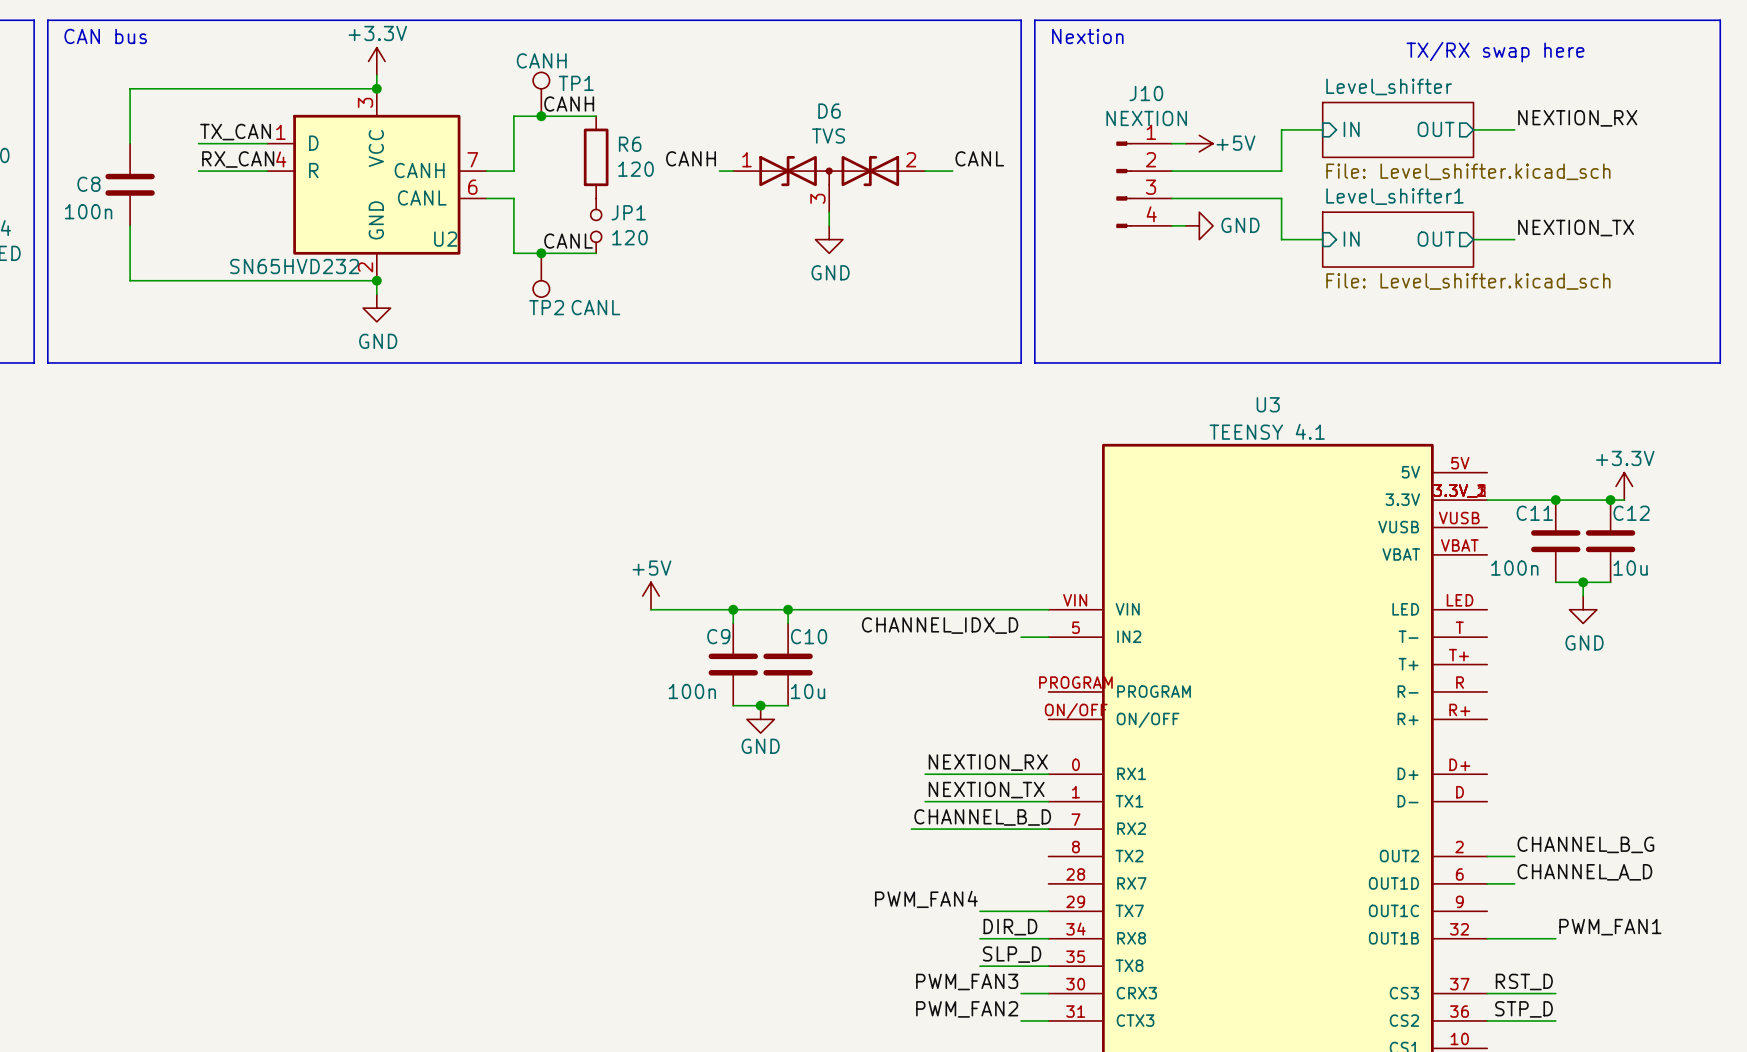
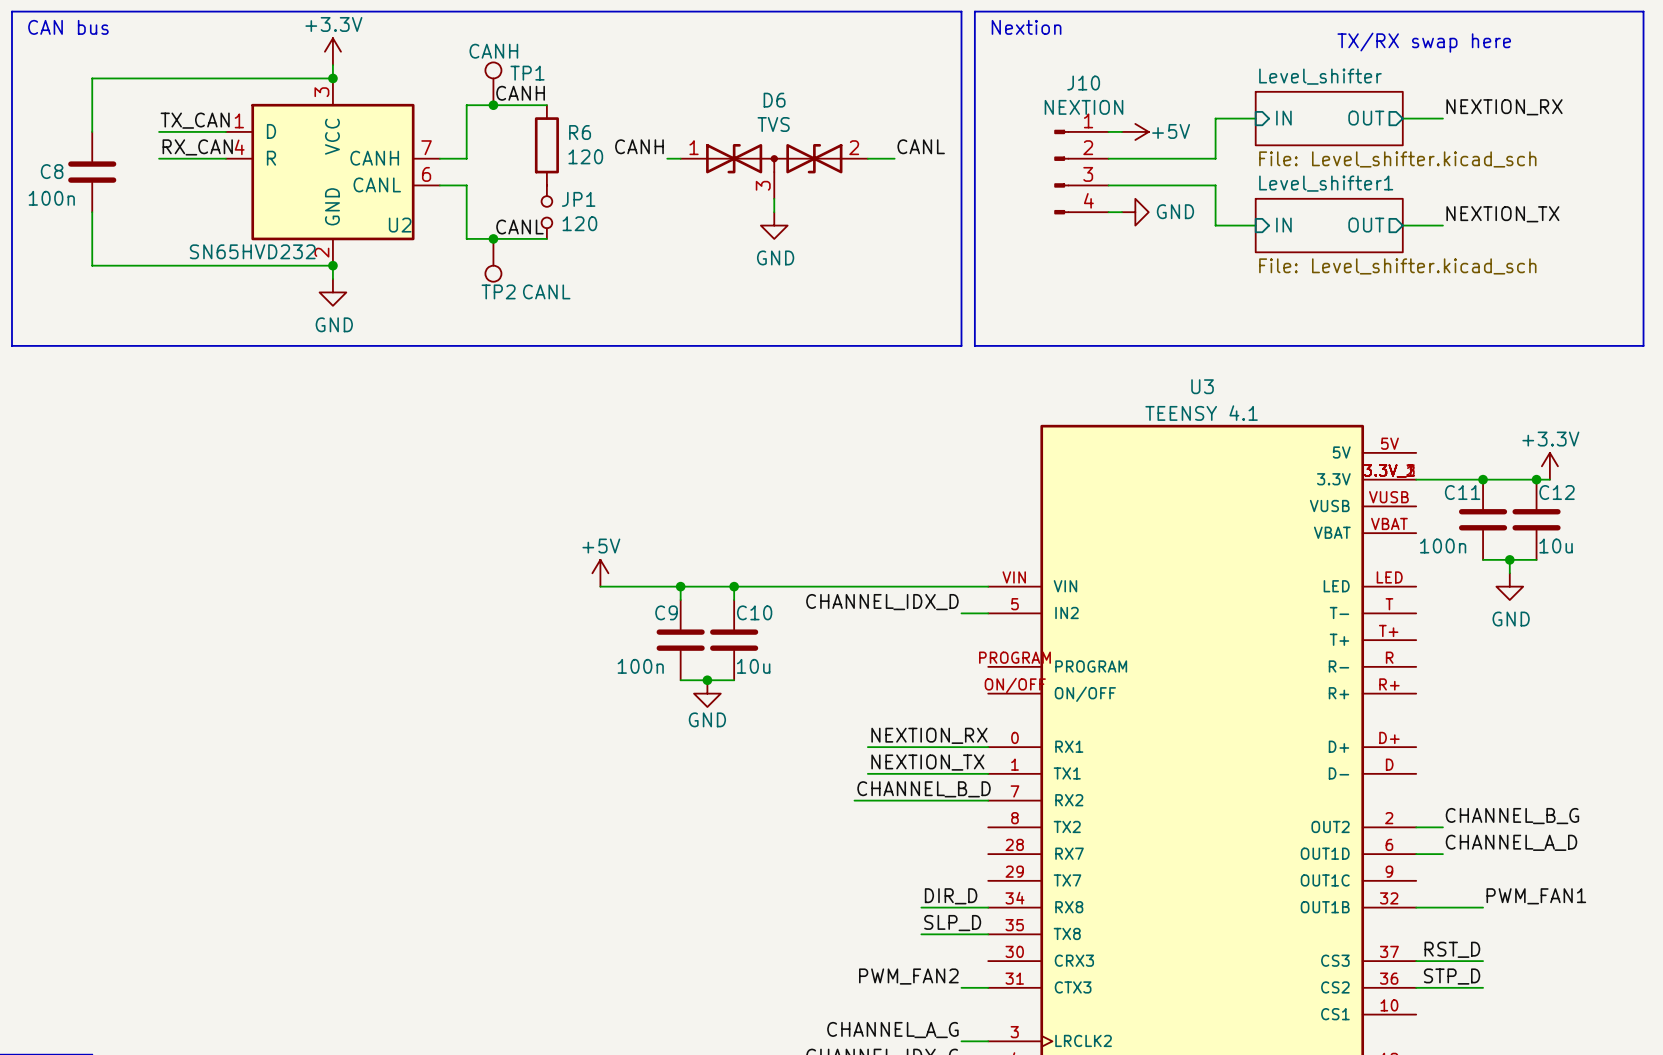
label: PWM_FAN4 (926, 899) -> none
wire: (980, 911) (1048, 911) -> none
label: PWM_FAN3 (967, 981) -> none
wire: (1021, 993) (1048, 993) -> none

